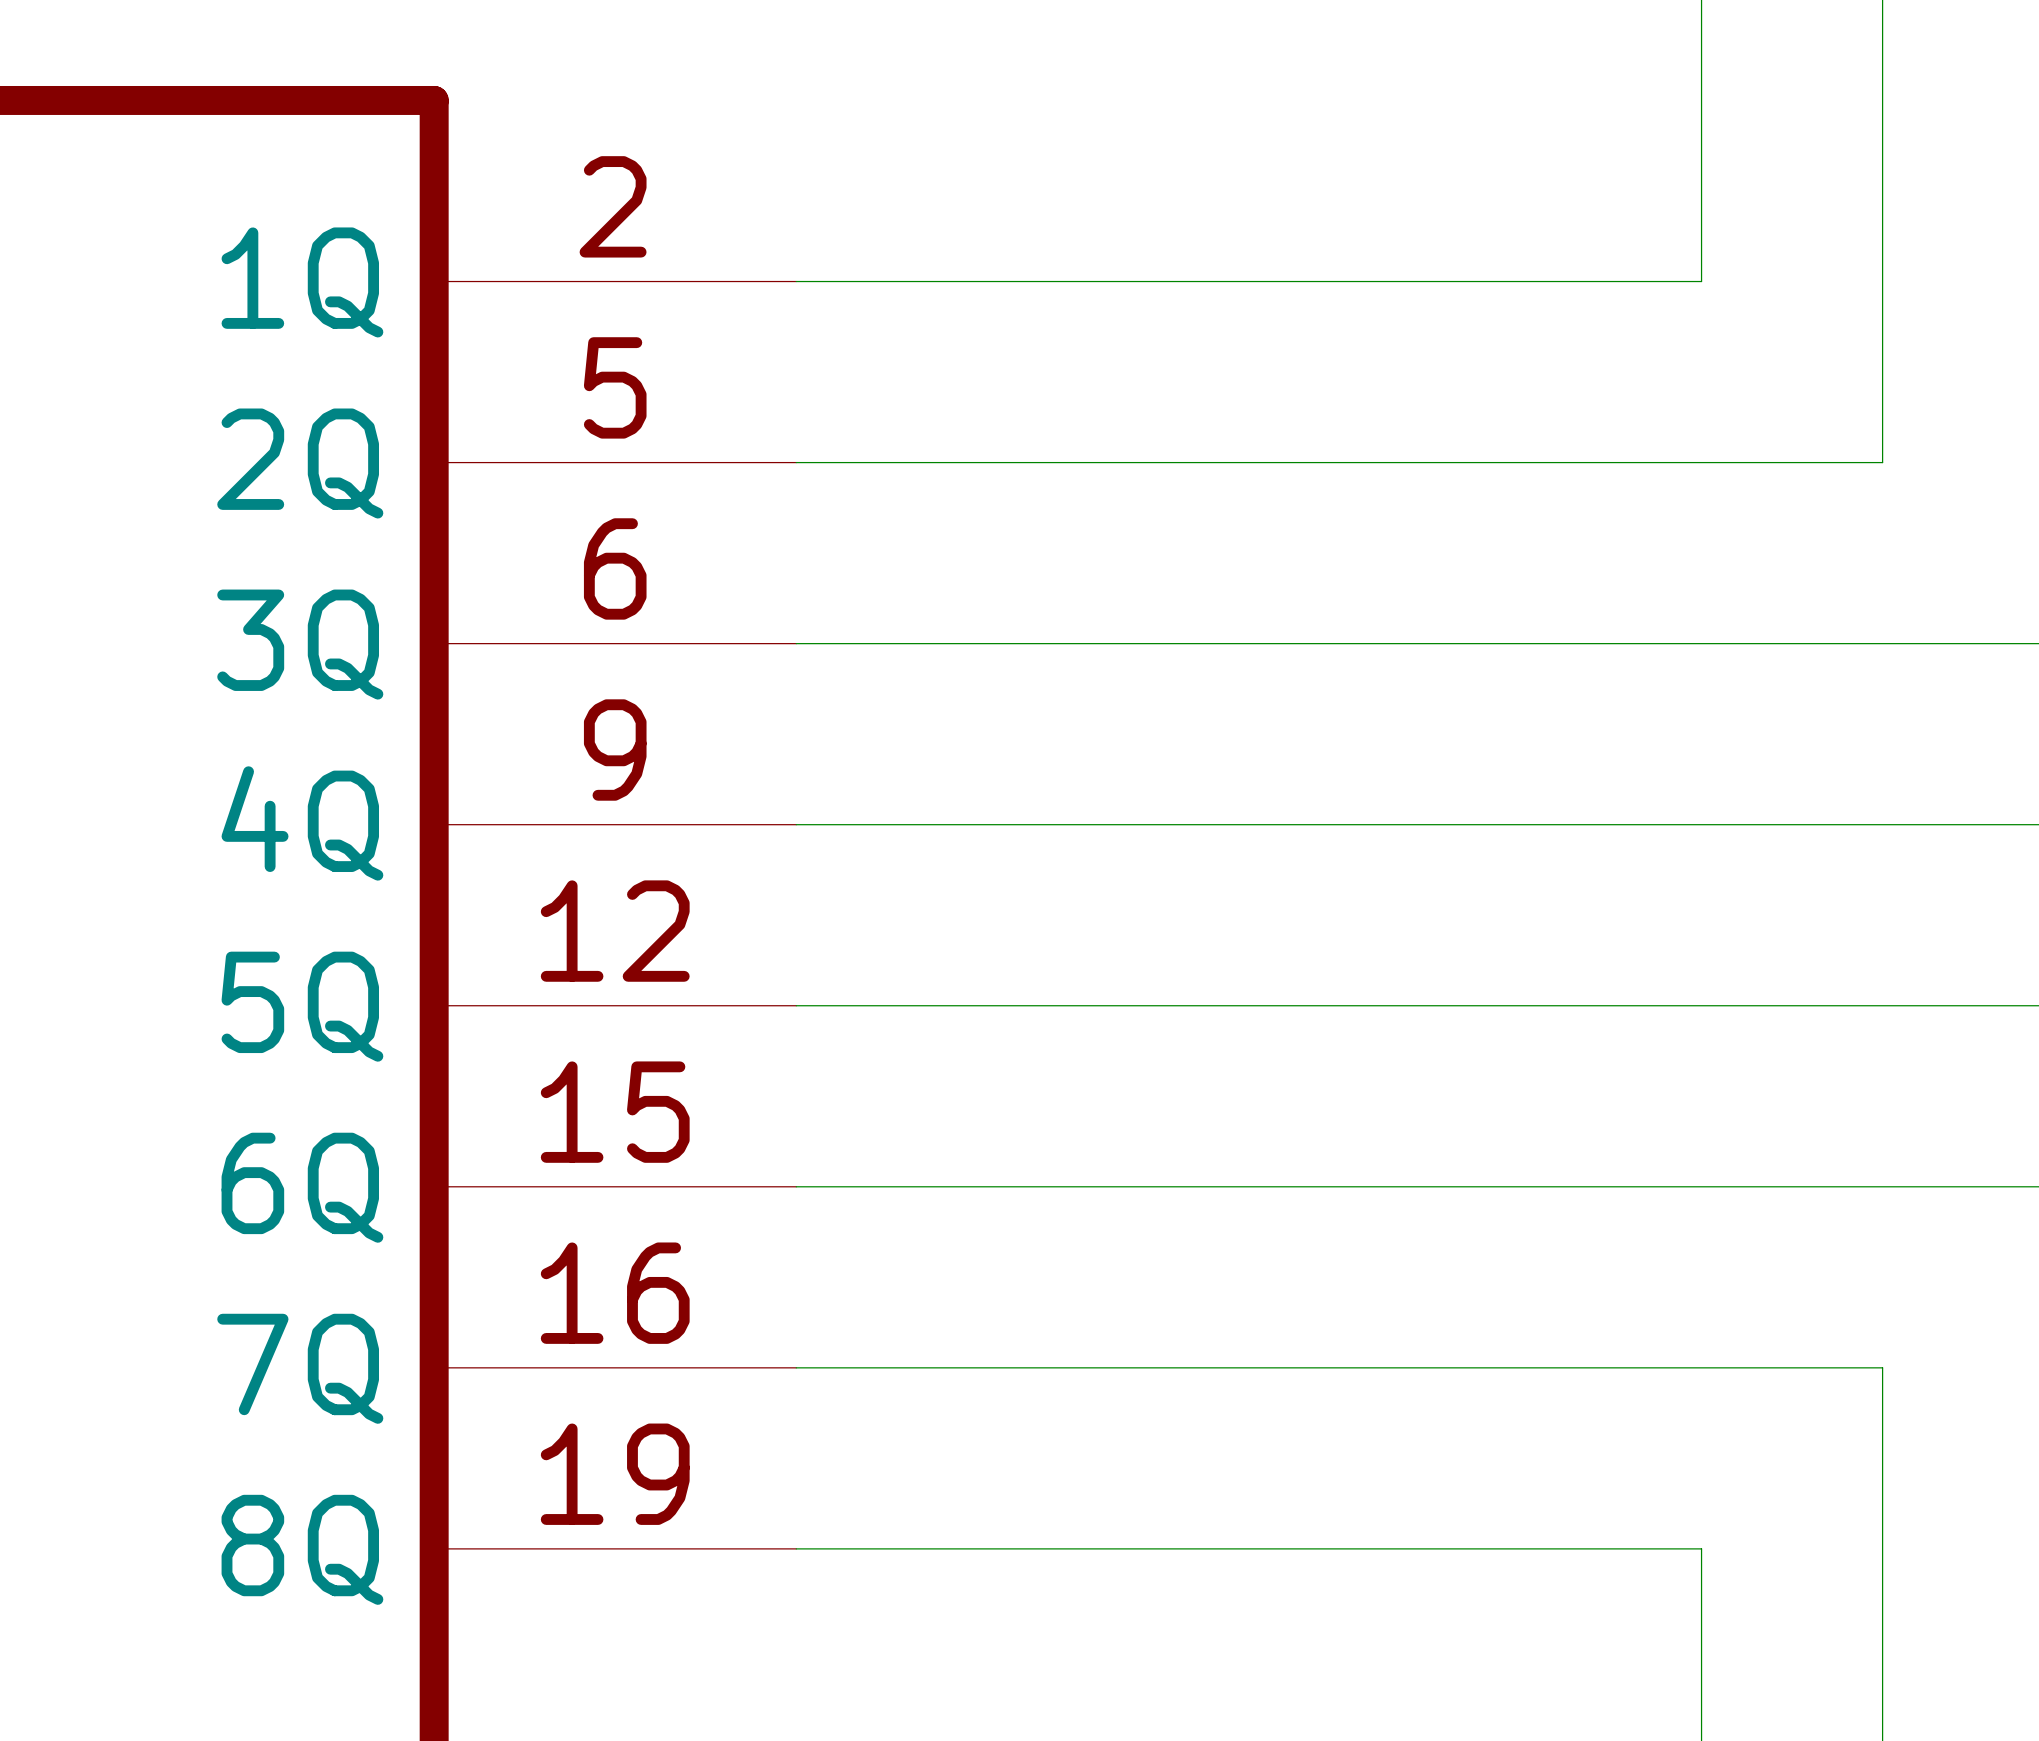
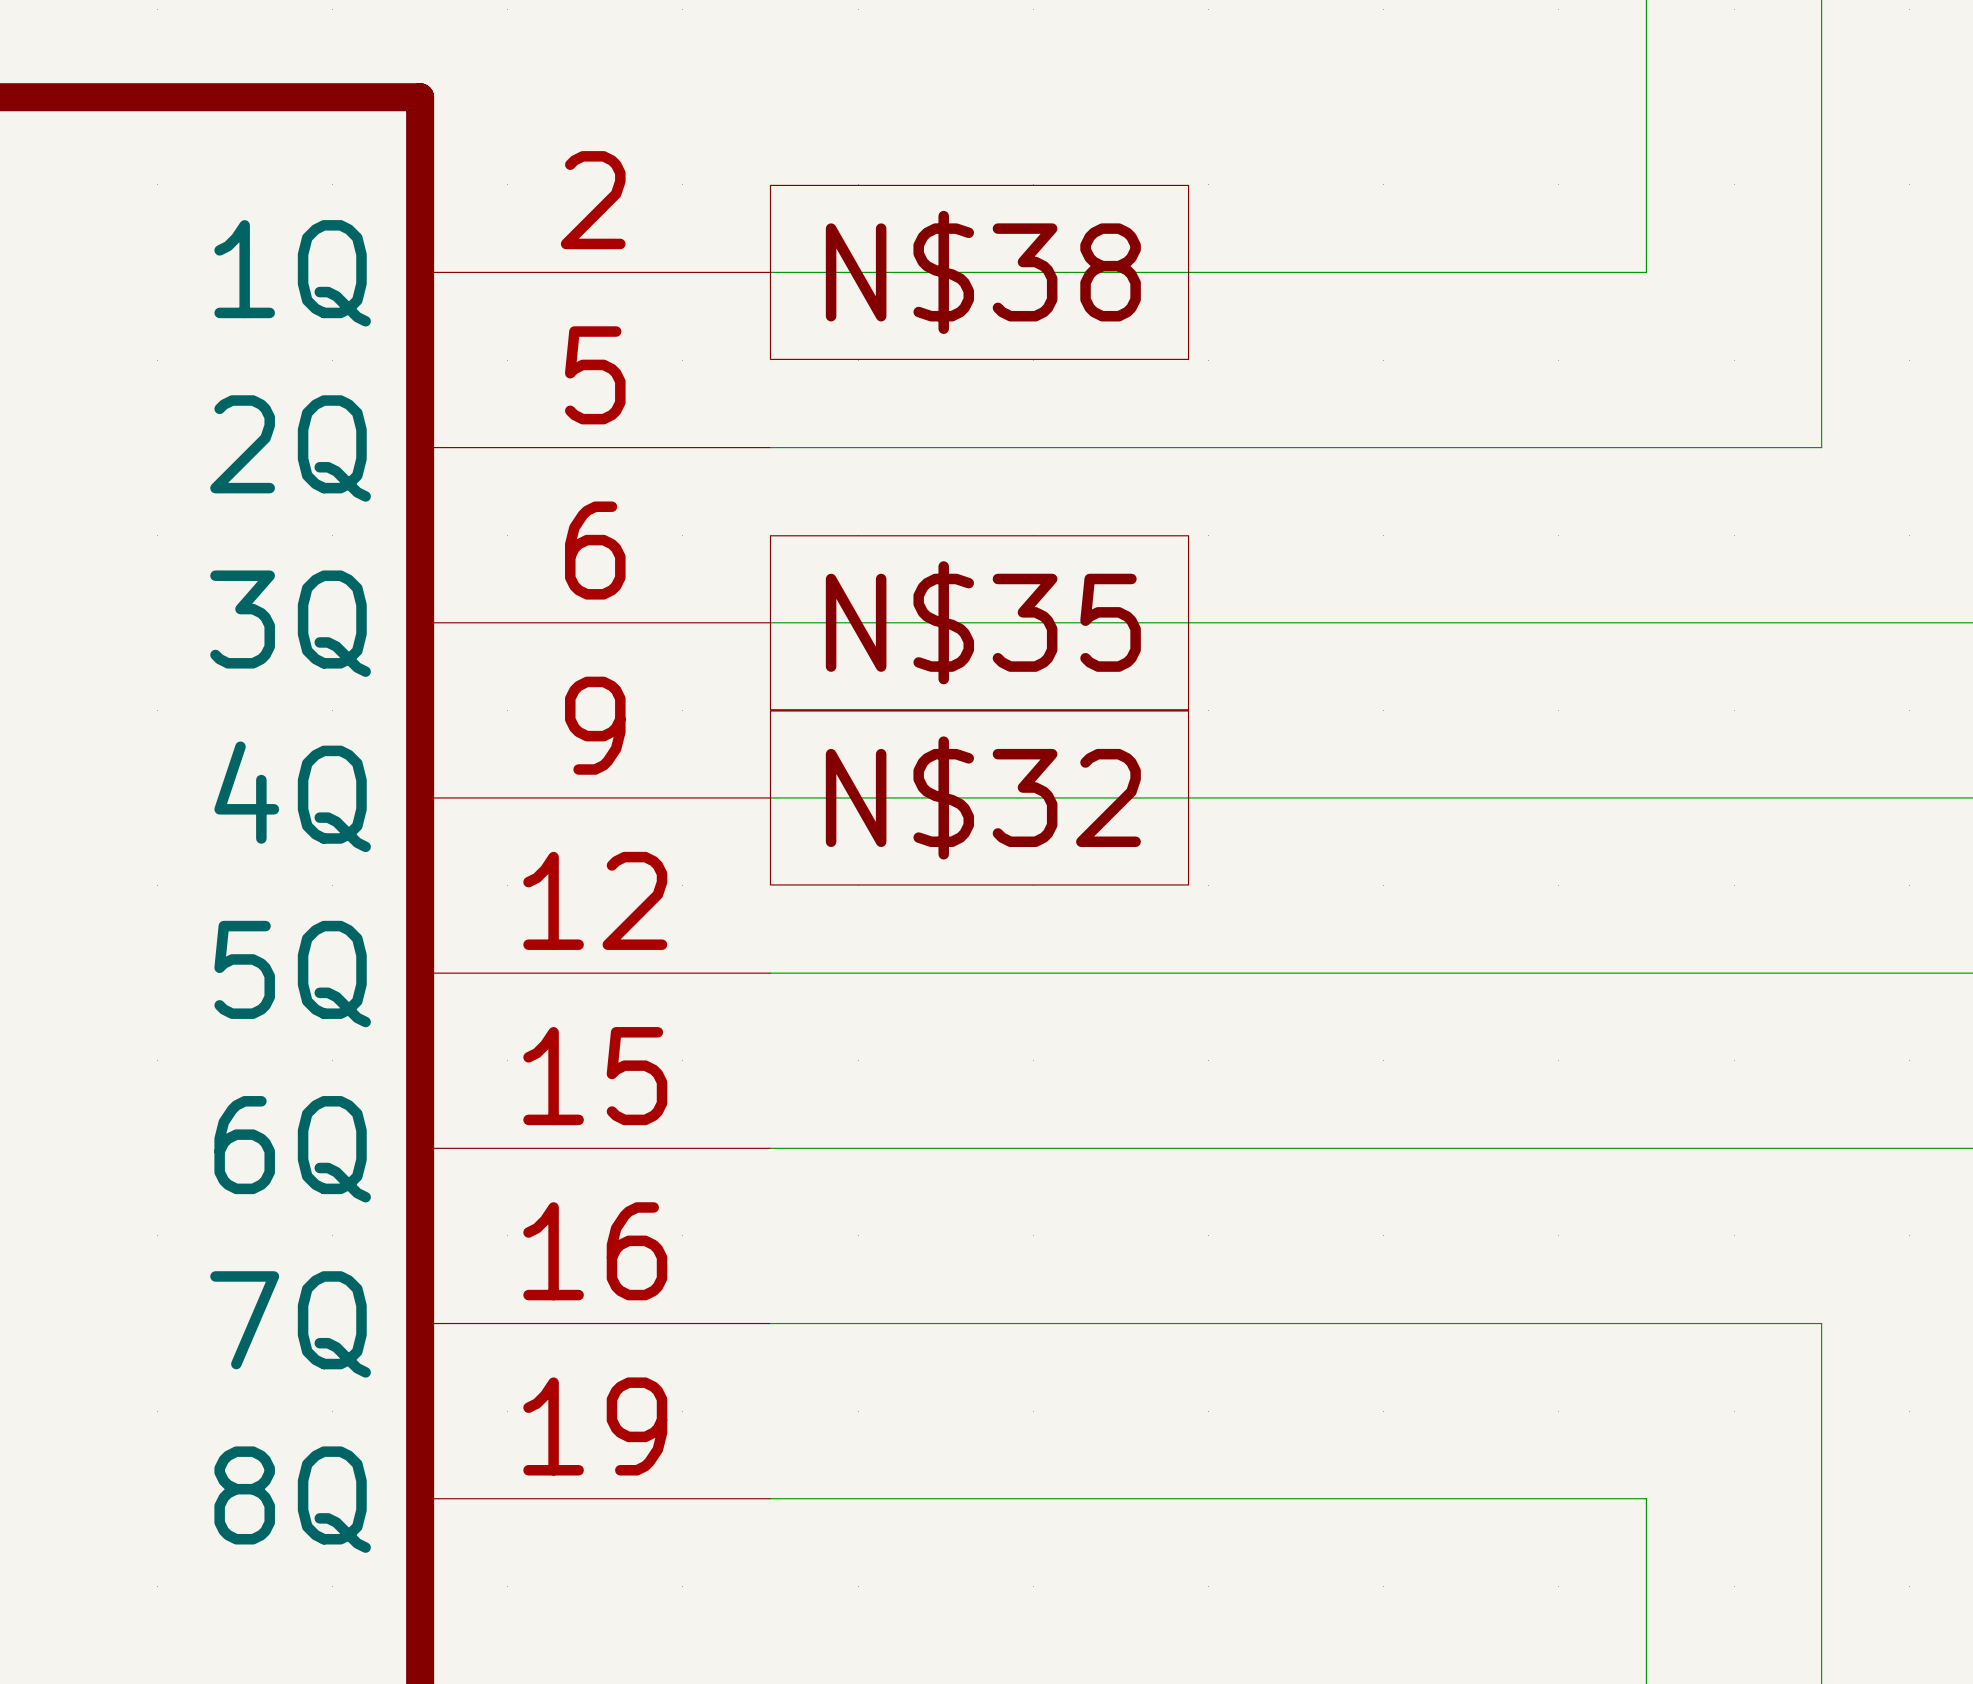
global label: none -> N$38 (983, 272)
global label: none -> N$35 (983, 622)
global label: none -> N$32 (983, 797)

